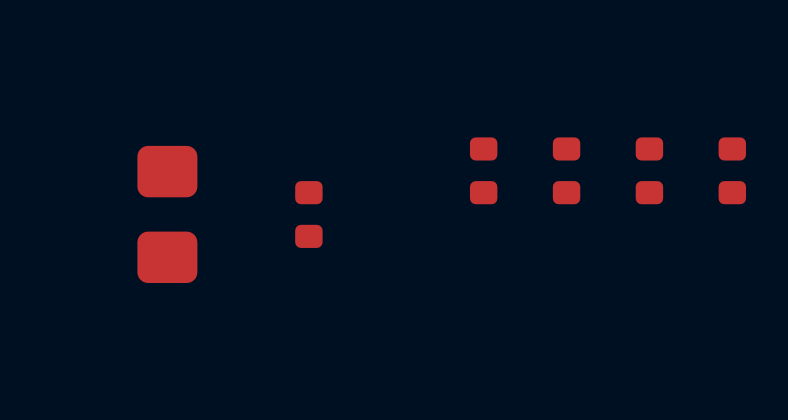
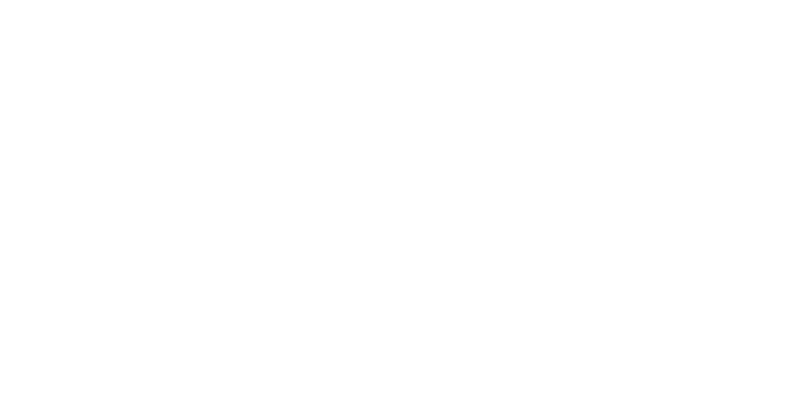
part: (483, 170) -> none
part: (566, 170) -> none
part: (649, 170) -> none
part: (732, 170) -> none
part: (167, 214) -> none
part: (308, 214) -> none

